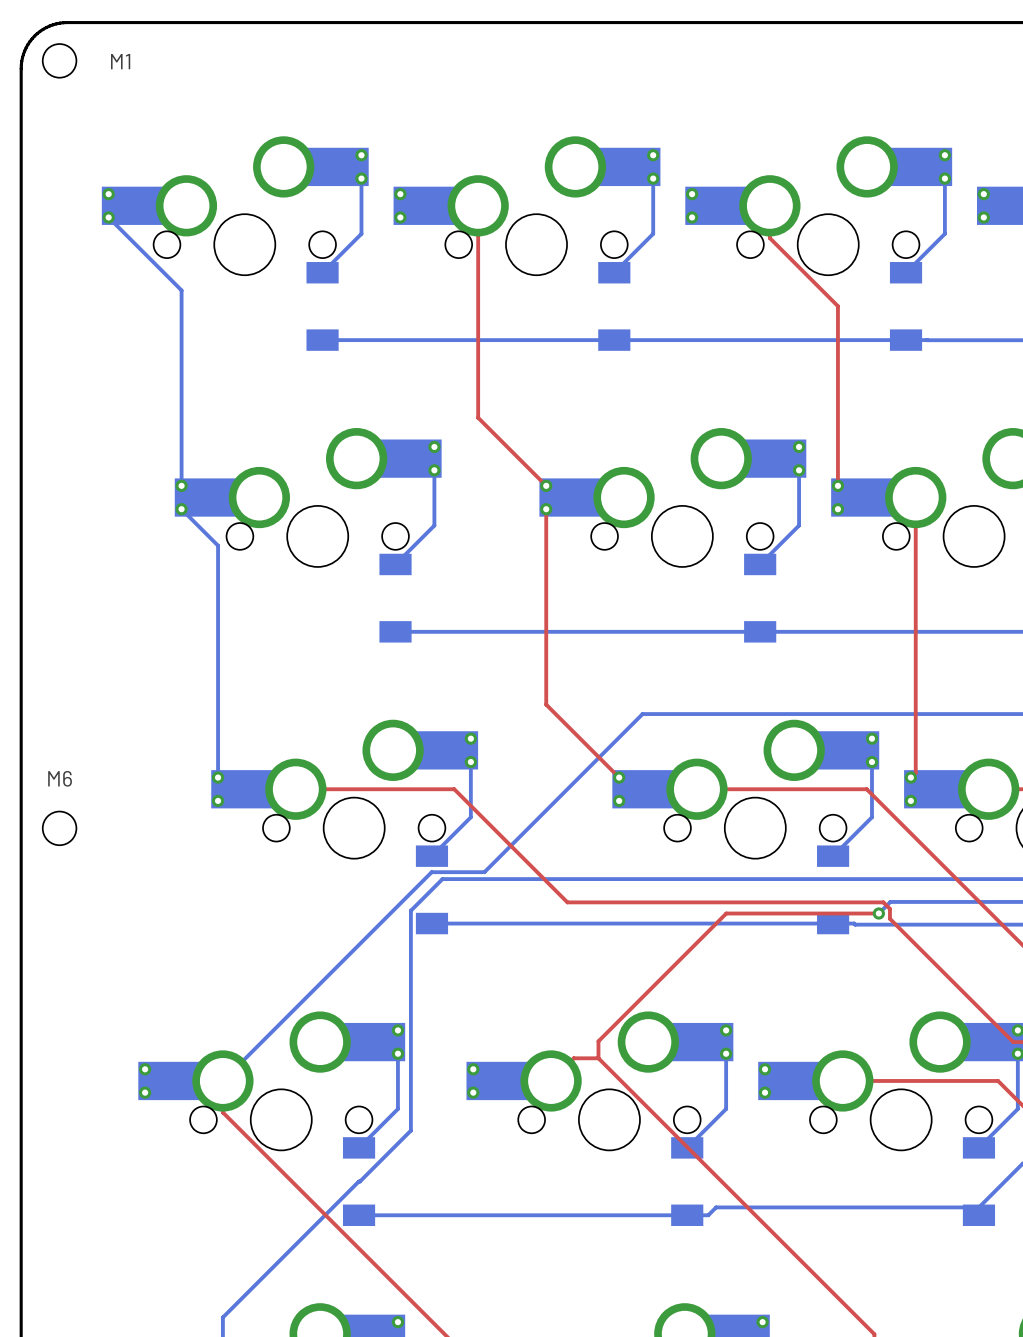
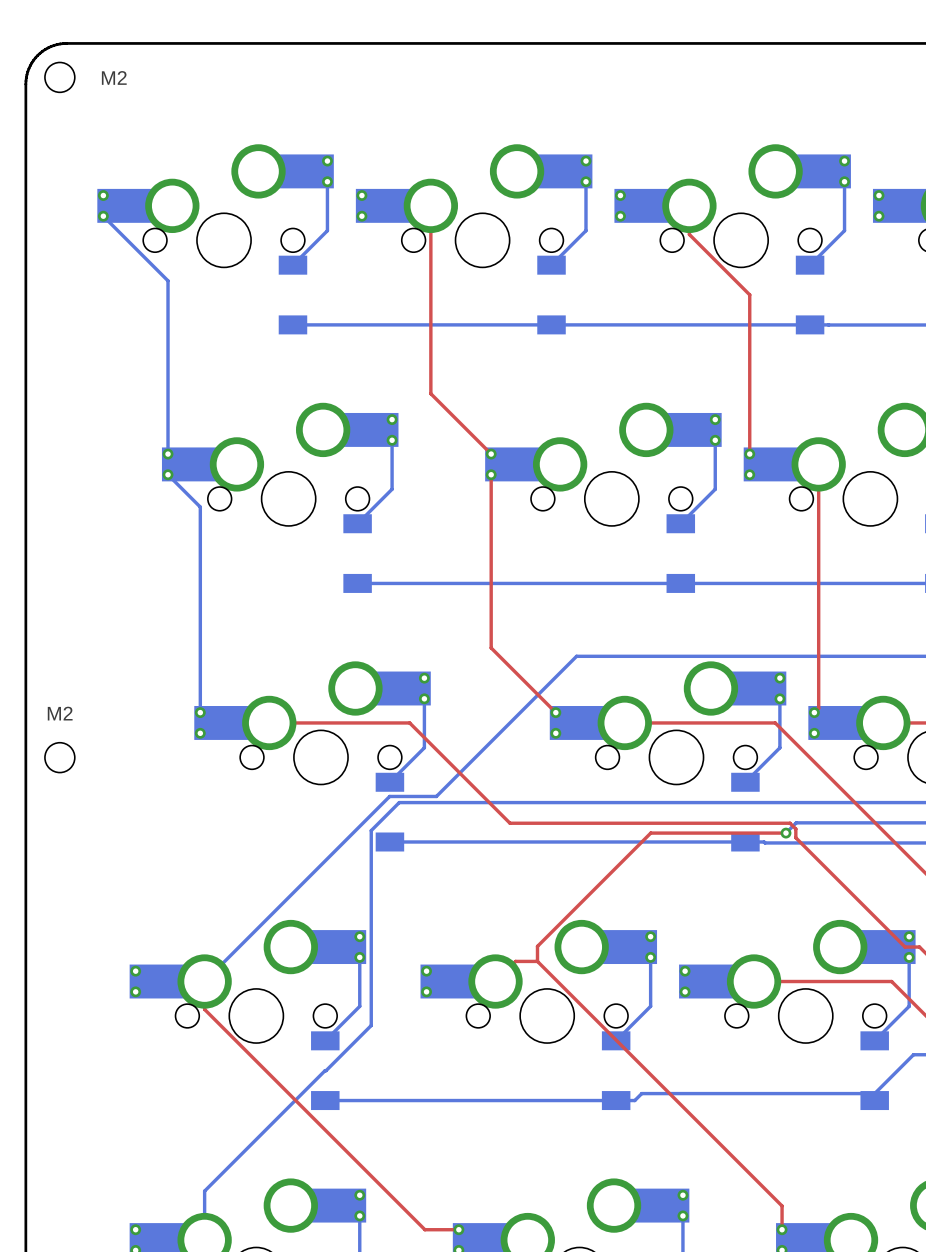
M1 name: M1 (120, 61) -> M2 (114, 77)
M6 name: M6 (60, 778) -> M2 (60, 713)

